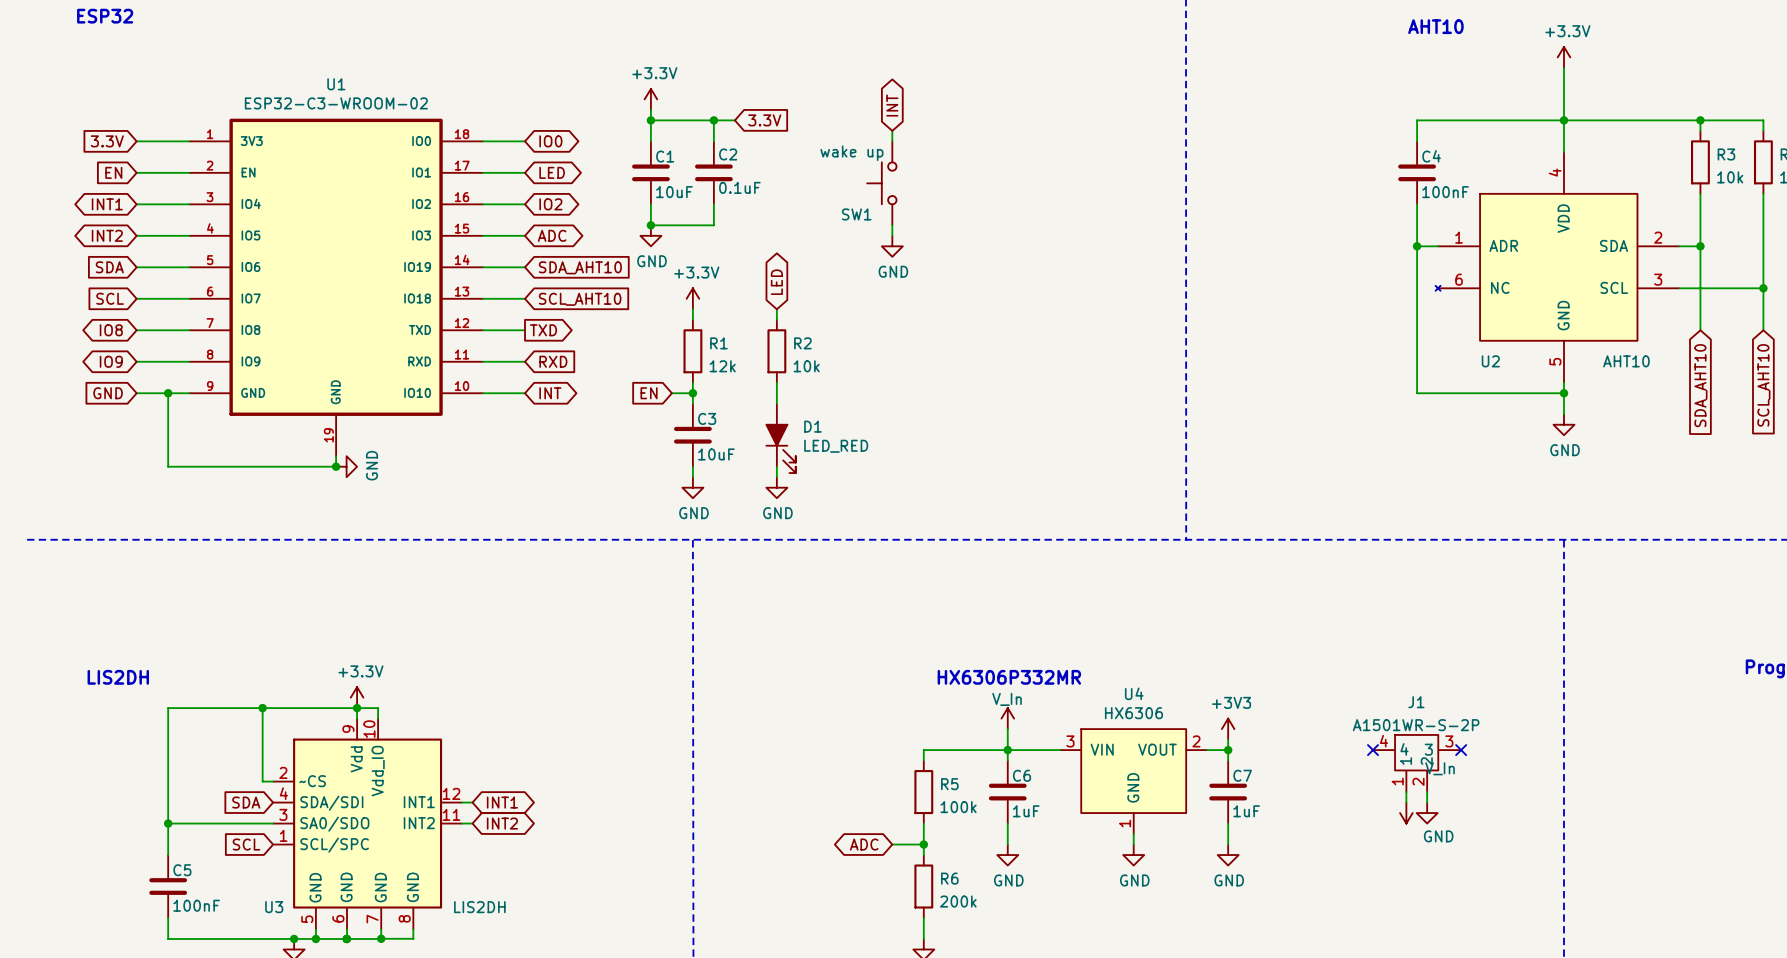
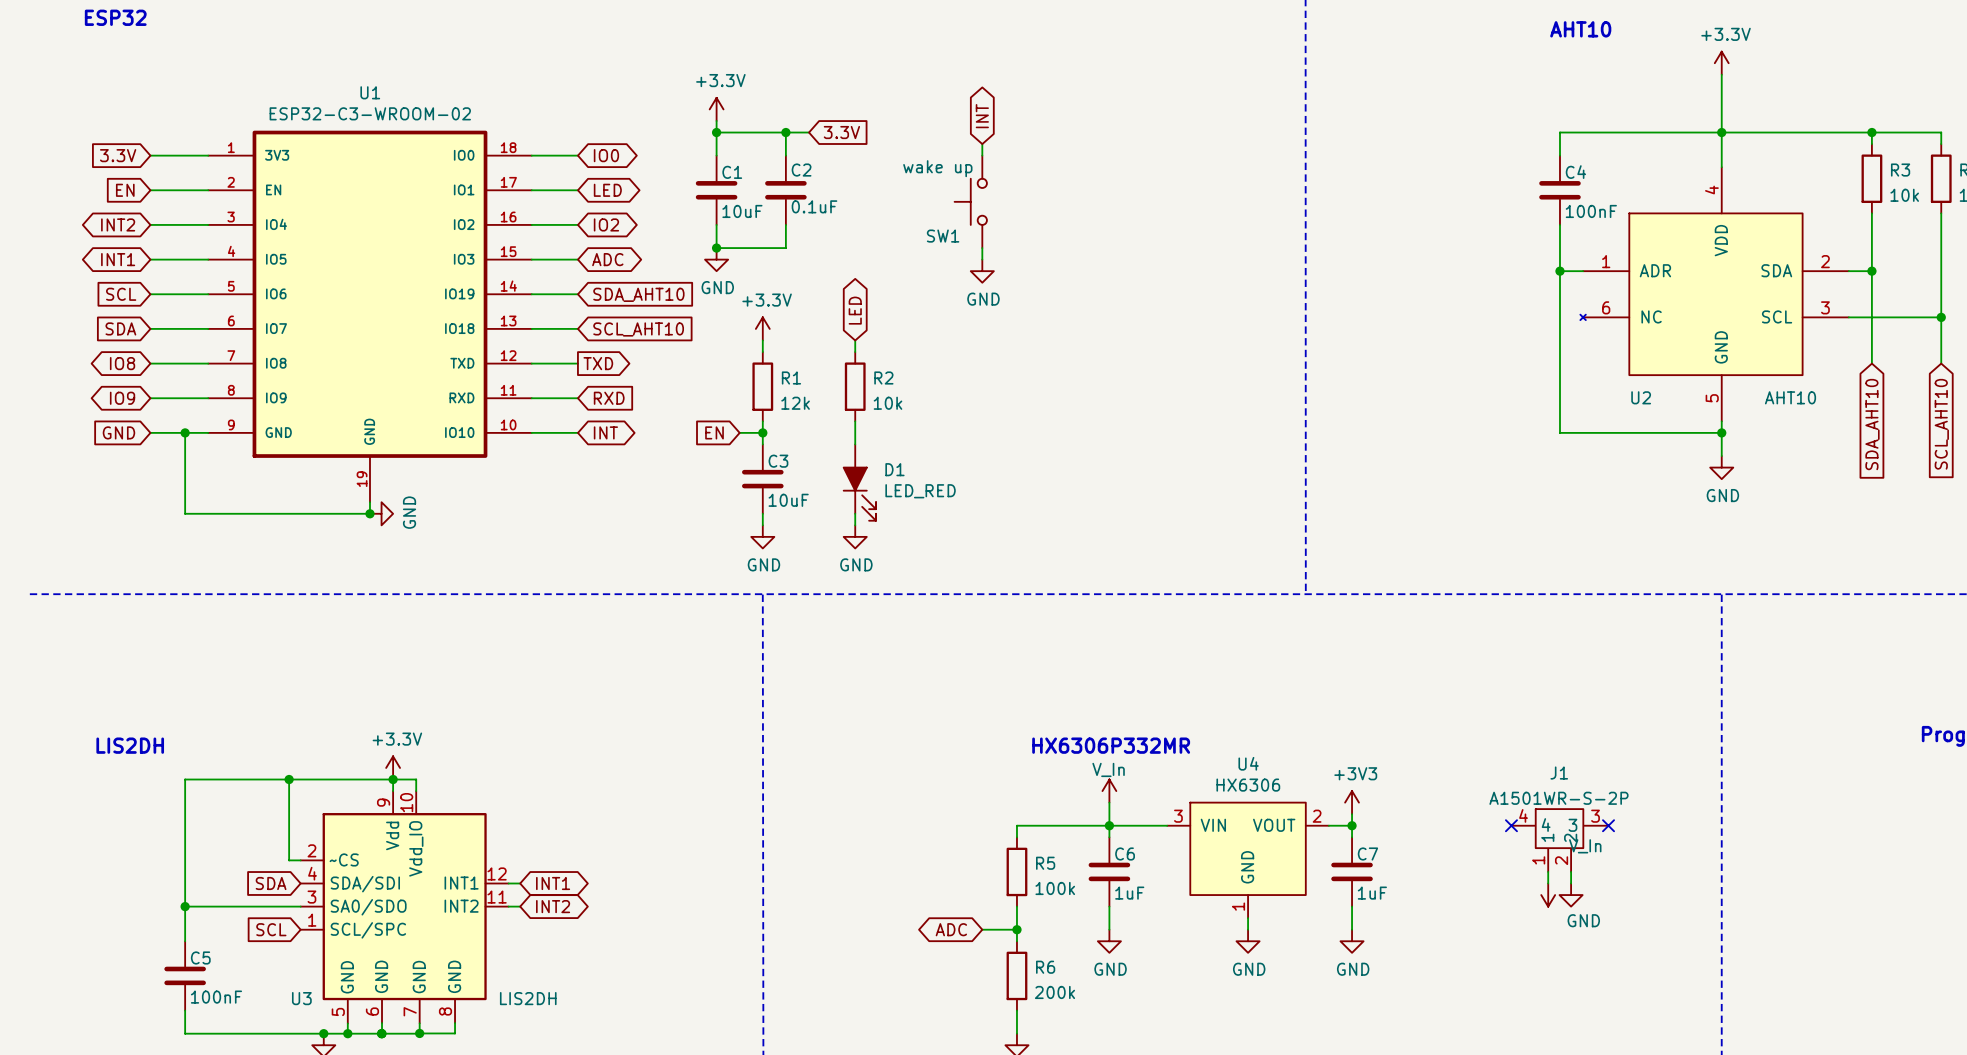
global label: INT1 (107, 204) -> INT2 (118, 224)
global label: INT2 (107, 235) -> INT1 (118, 259)
global label: SDA (109, 267) -> SCL (121, 294)
global label: SCL (110, 298) -> SDA (120, 328)

